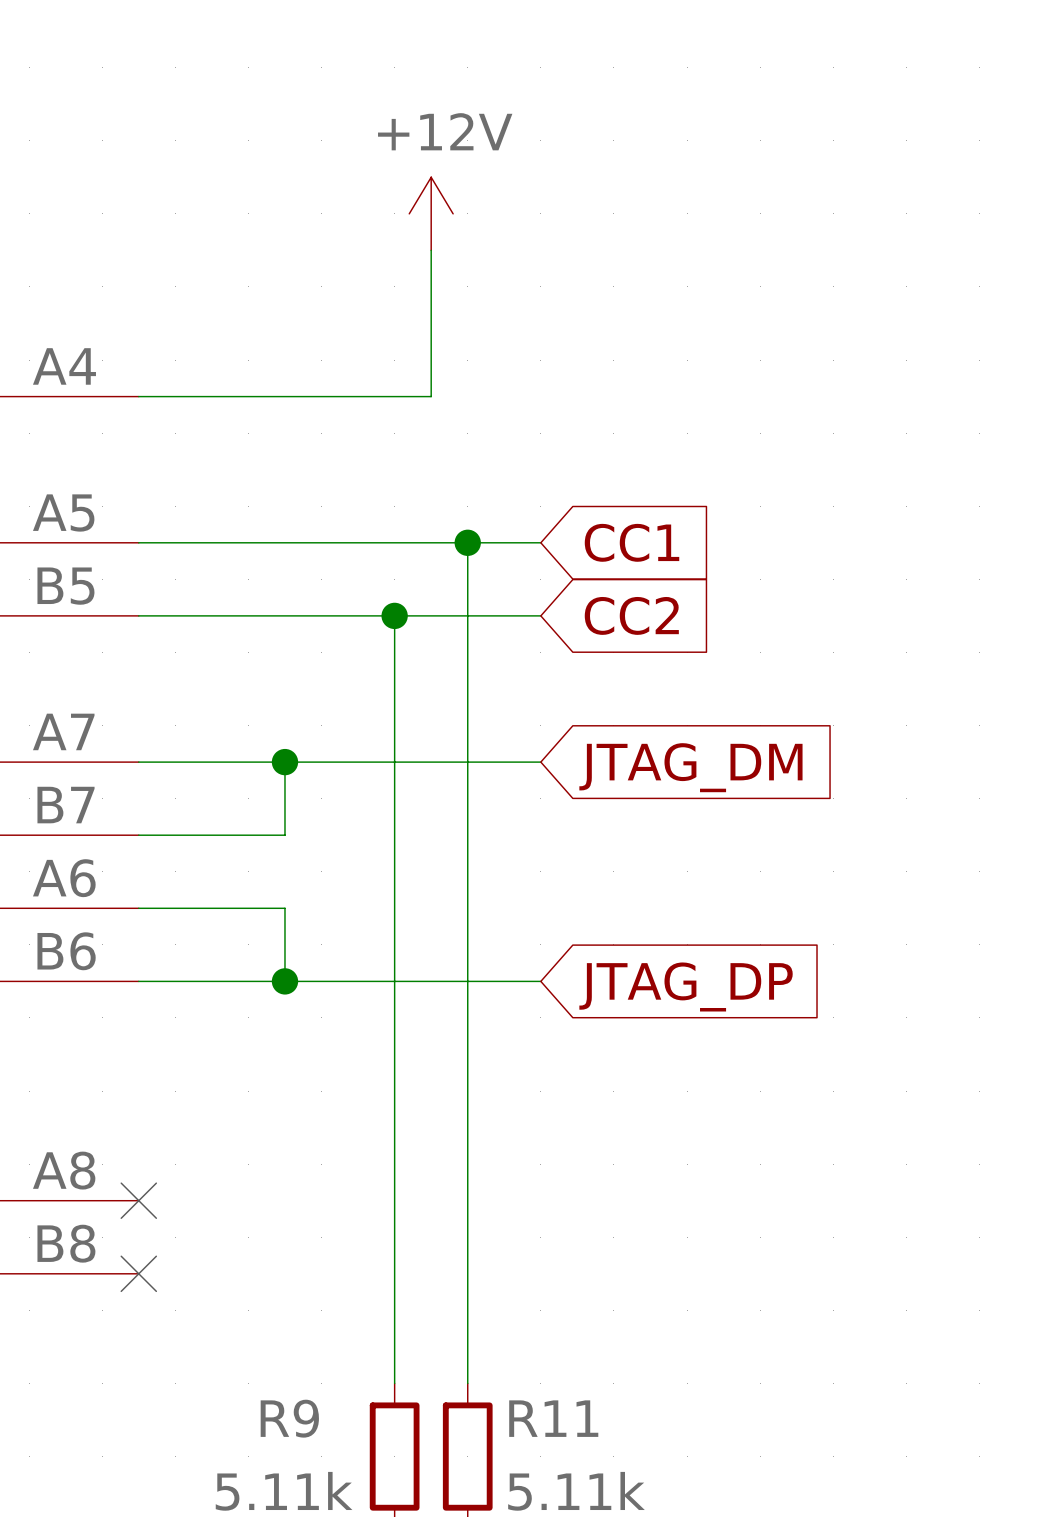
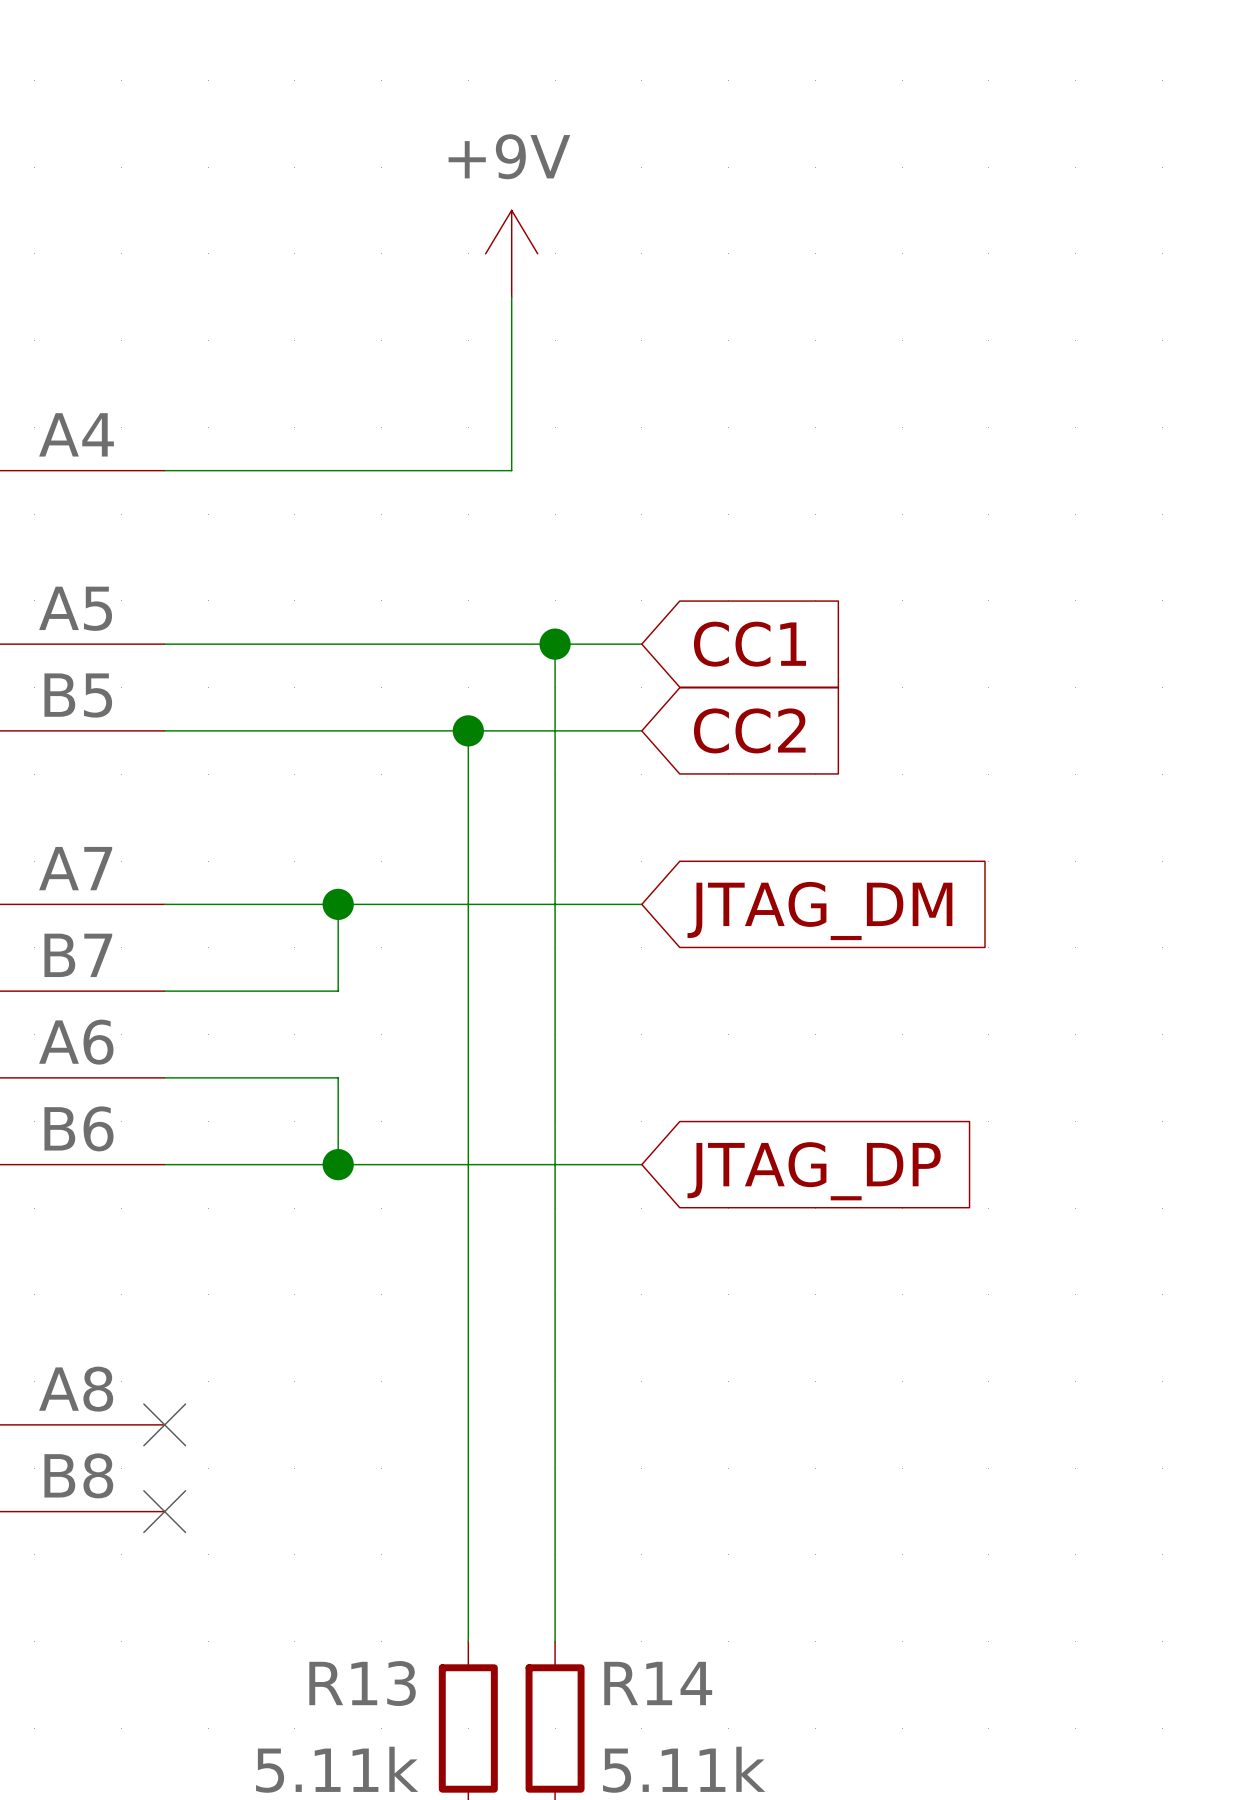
power symbol: +12V (431, 213) -> +9V (511, 253)
R9 name: R9 (289, 1418) -> R13 (362, 1683)
R11 name: R11 (553, 1418) -> R14 (658, 1683)

